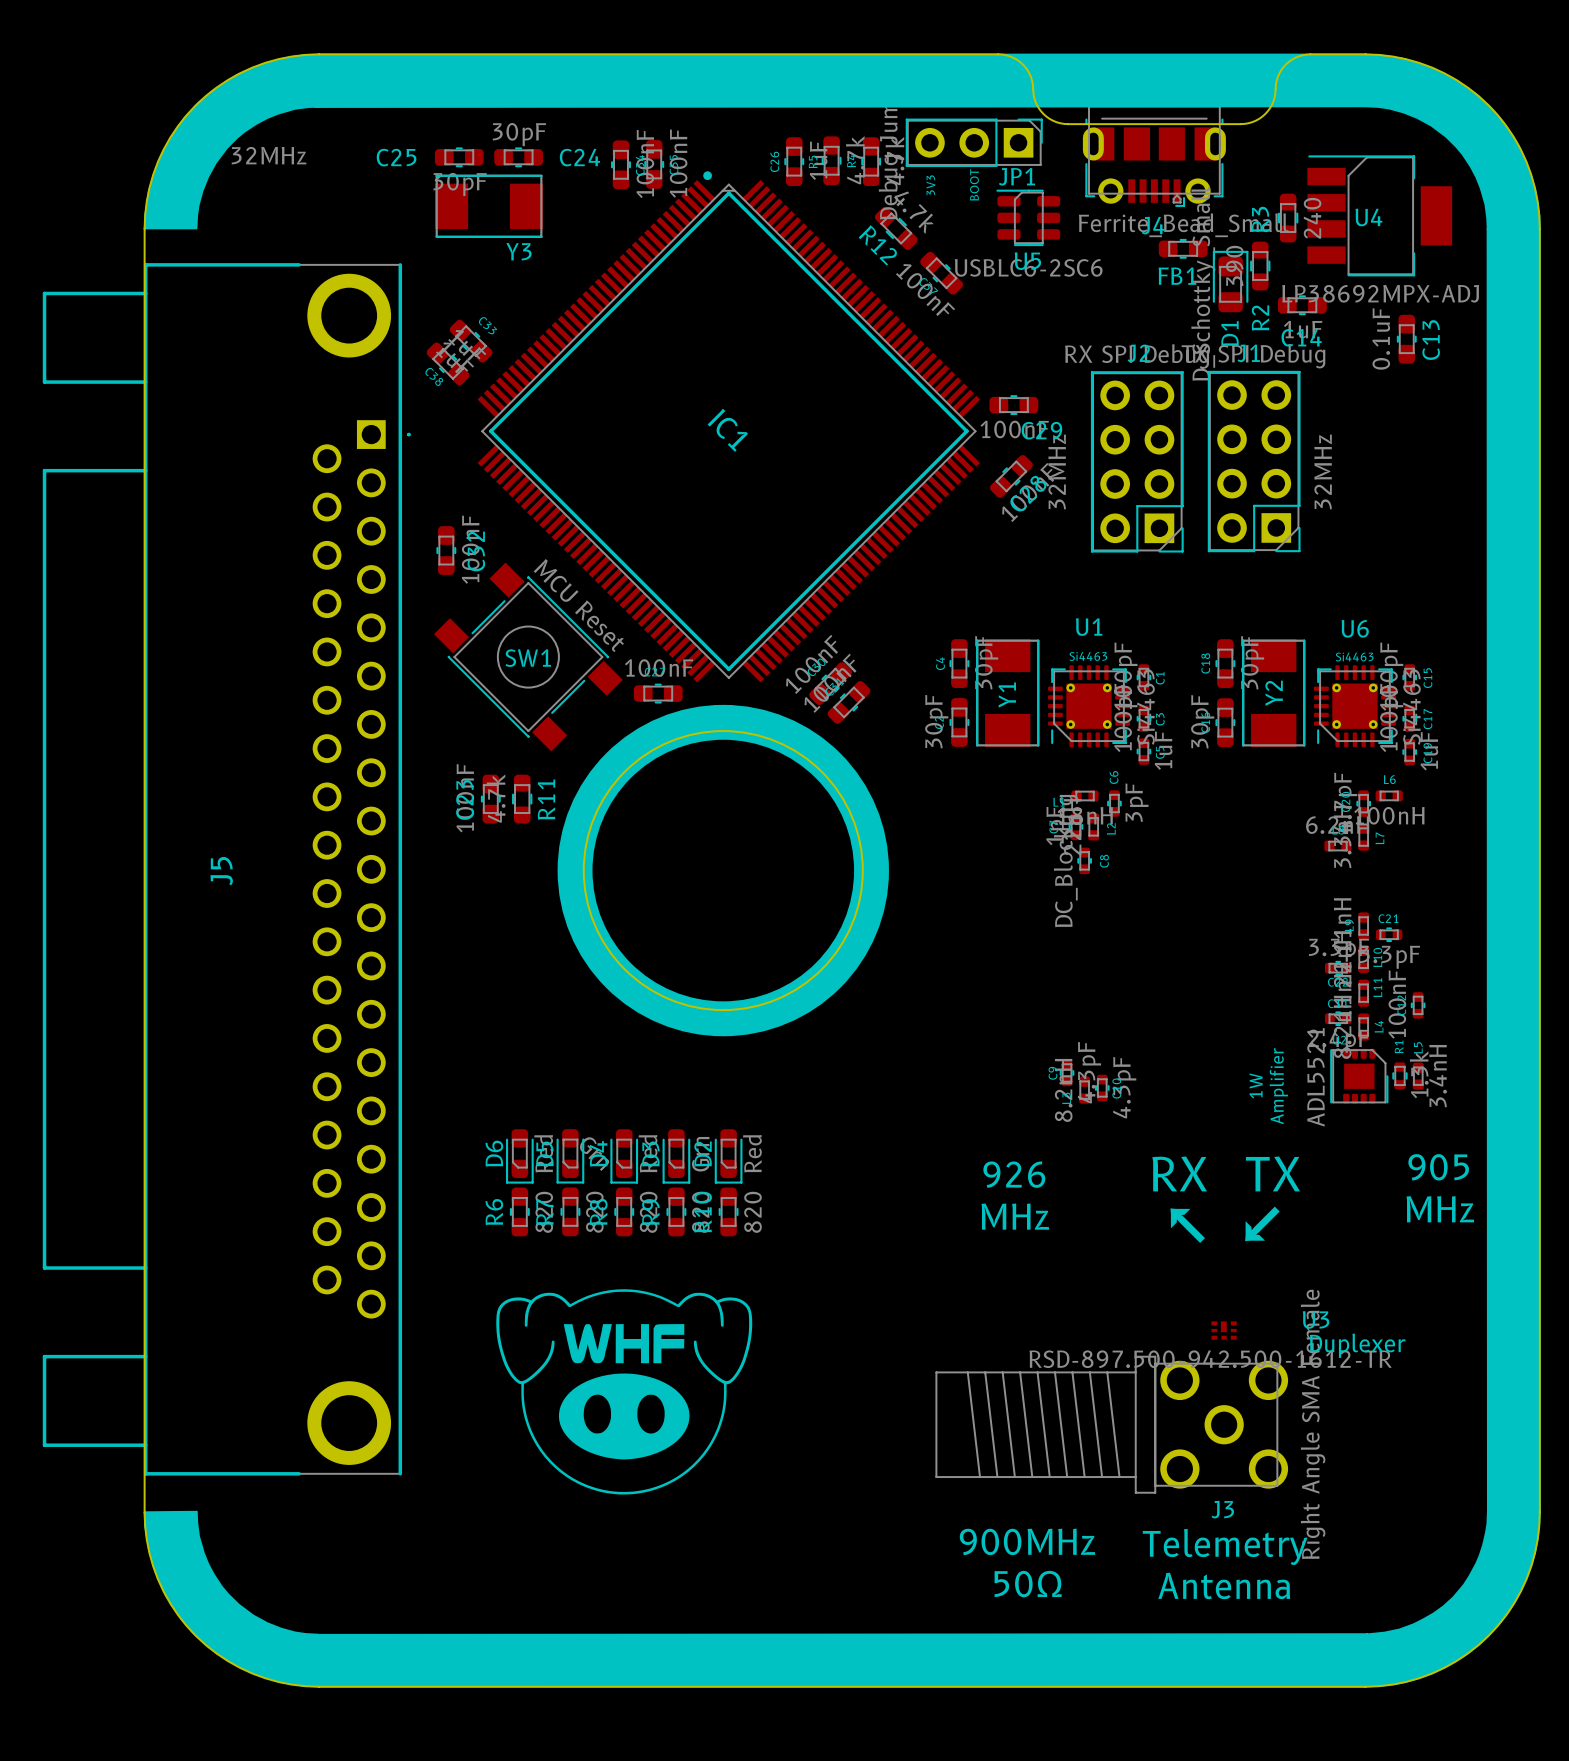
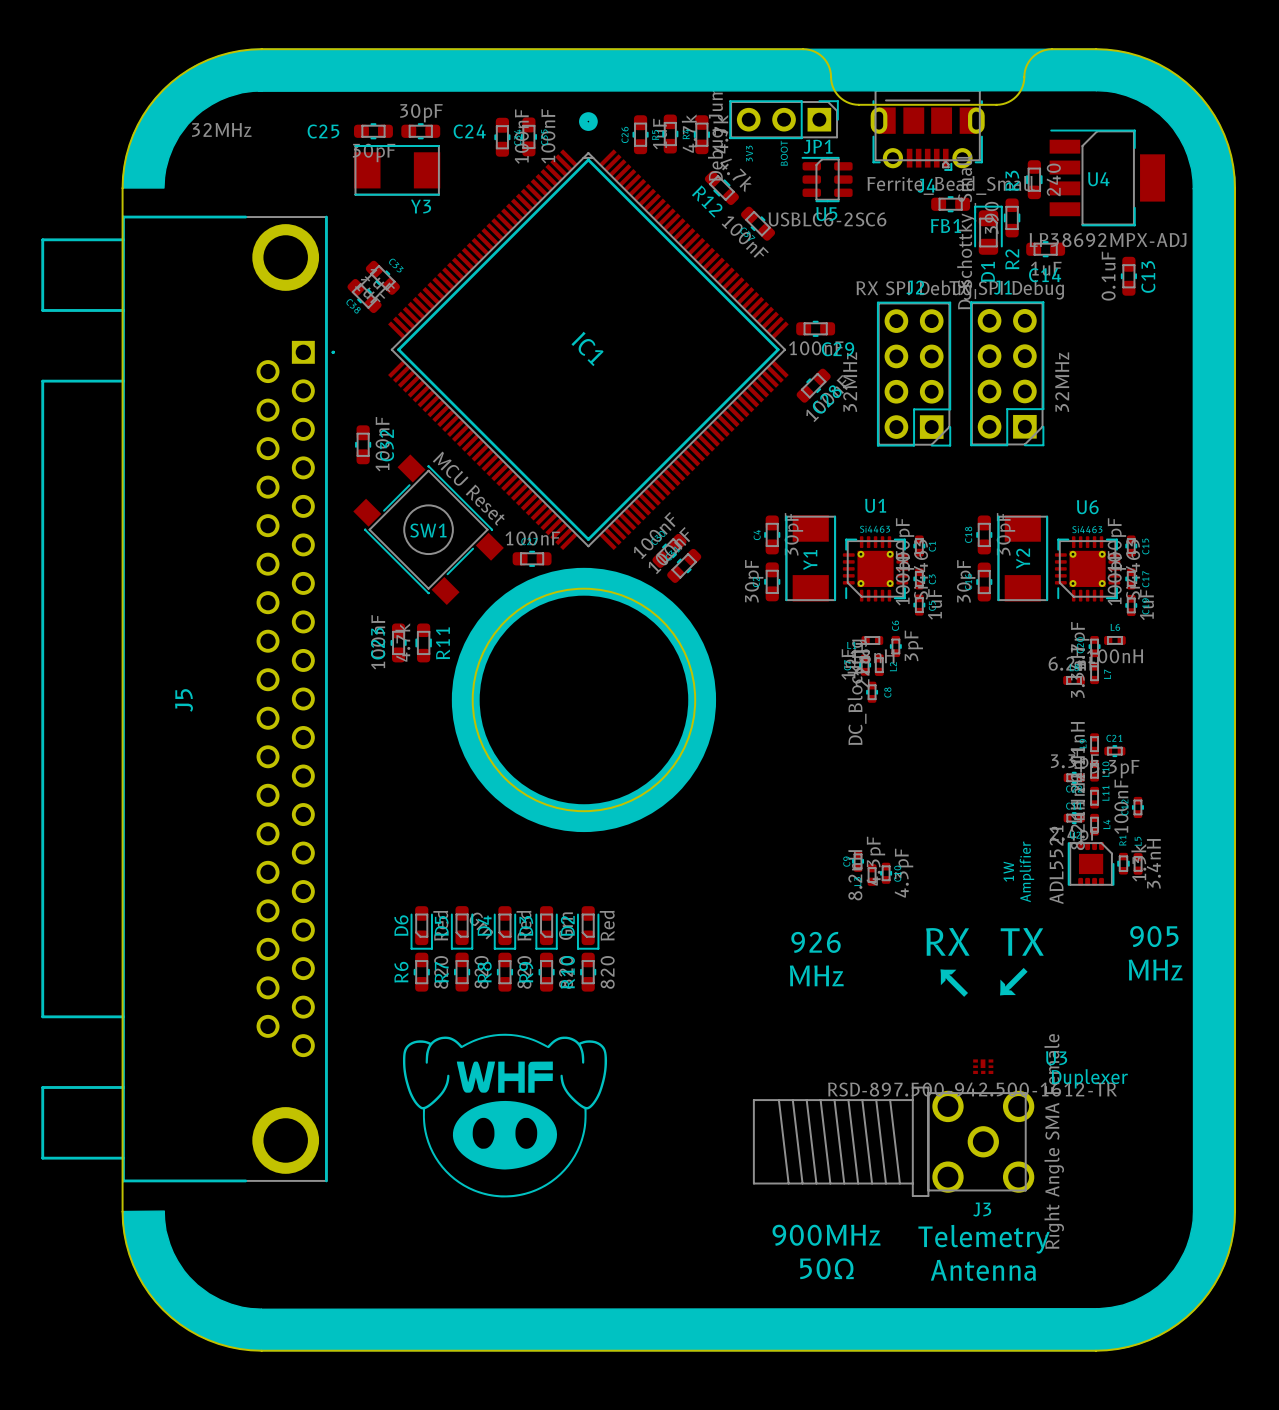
IC1 footprint: [477, 171, 981, 683] -> [388, 112, 789, 551]

